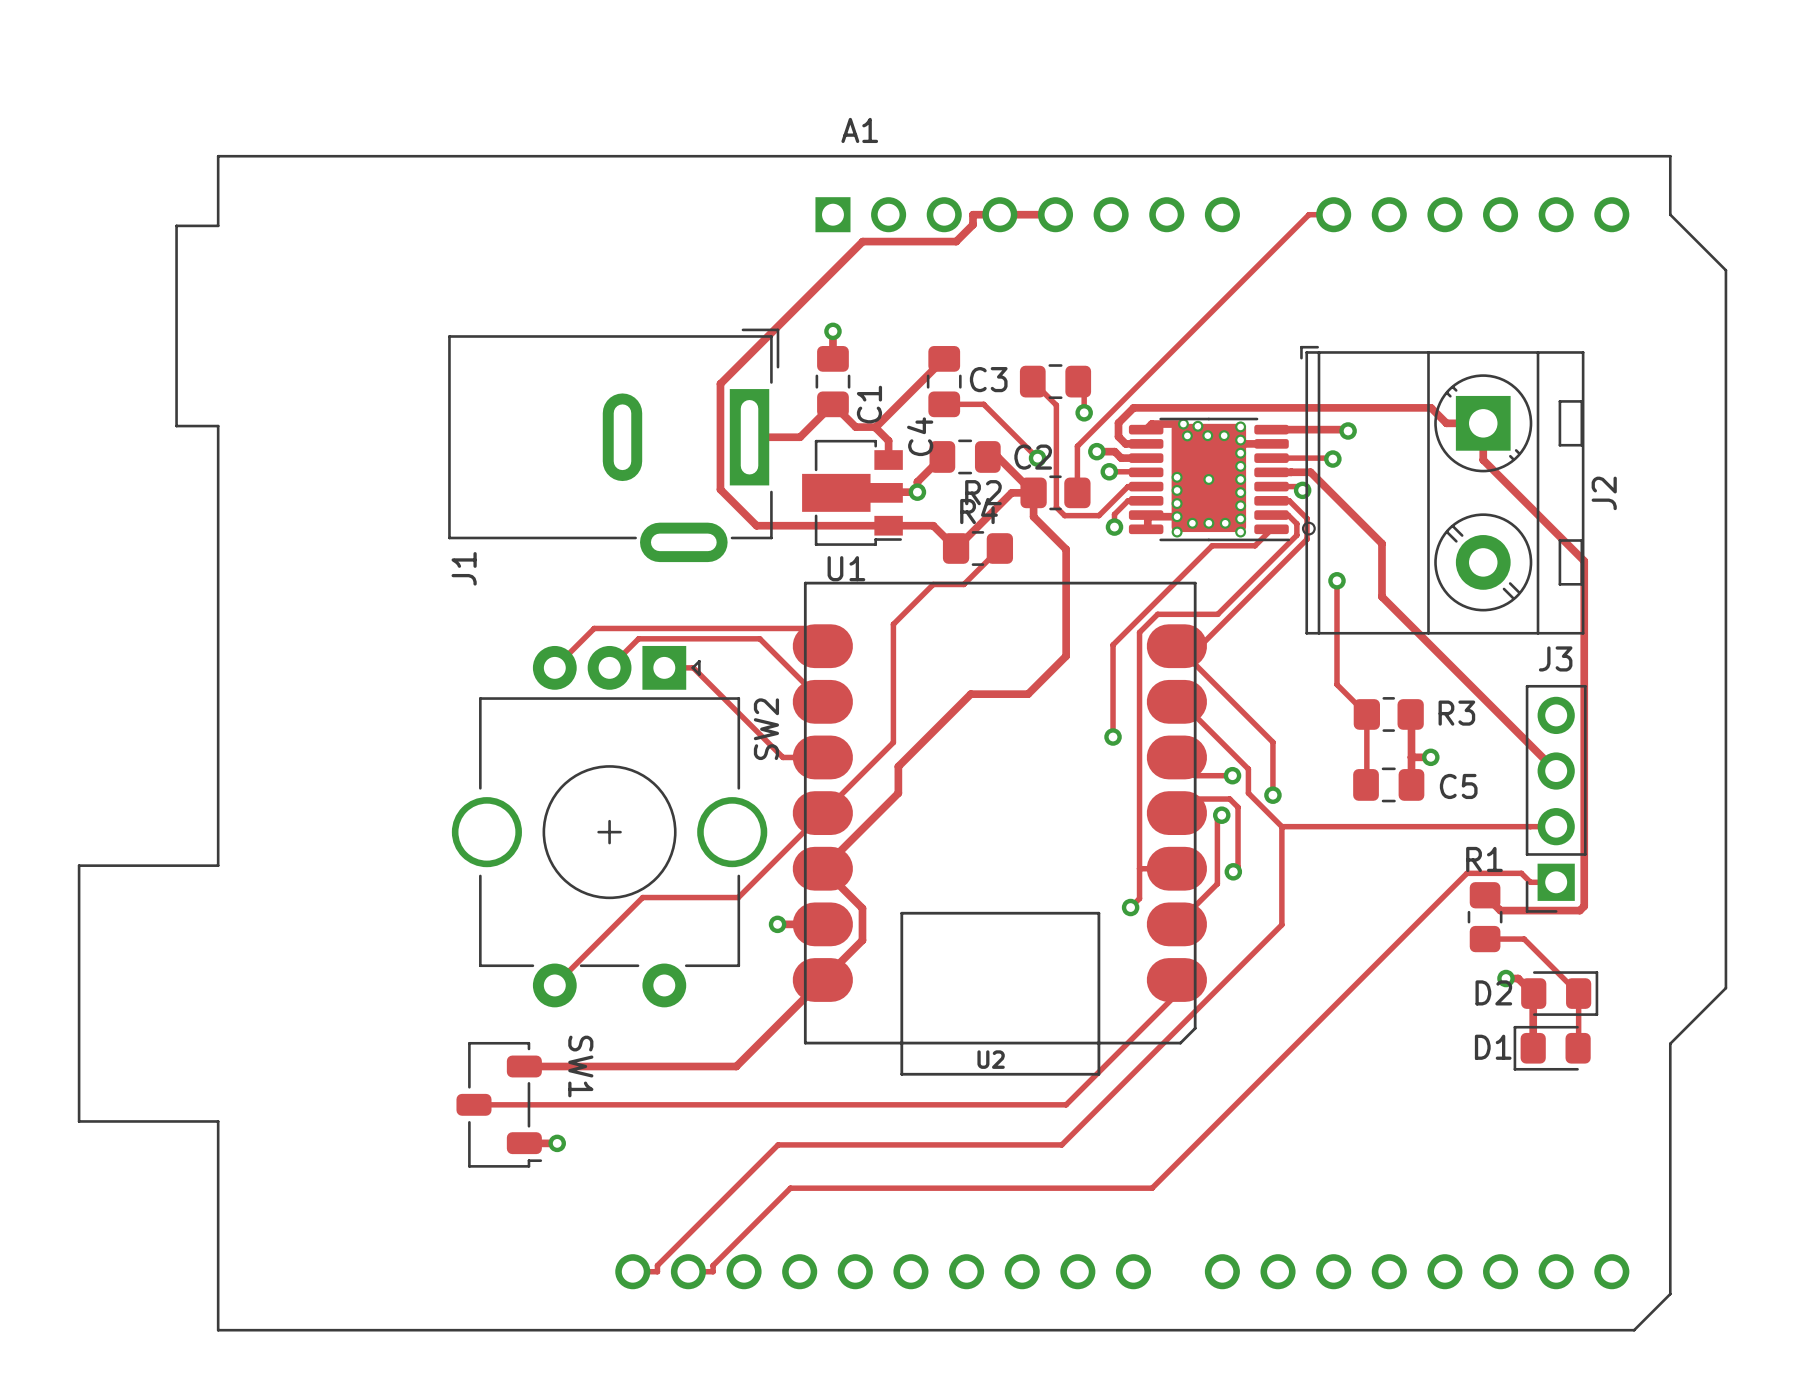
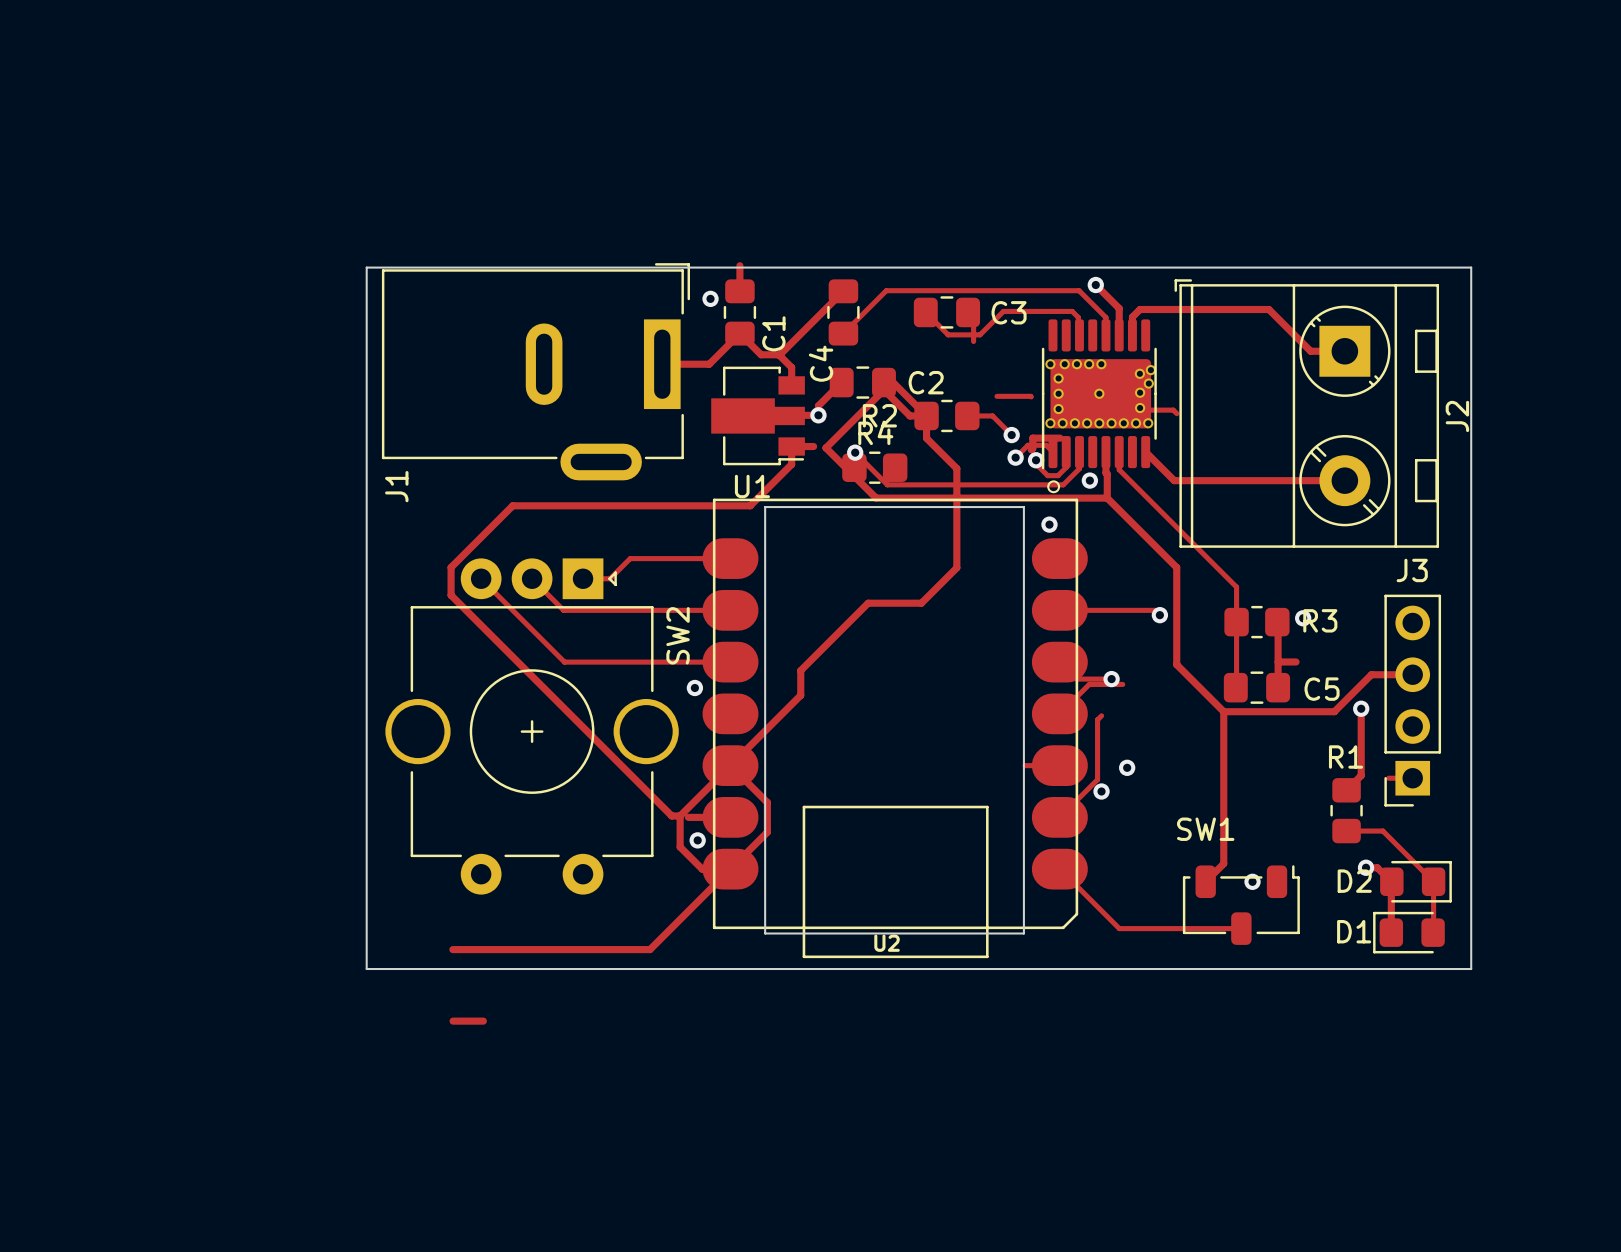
track: (1055, 214) (973, 214) (973, 224) (956, 241) (862, 241) (720, 383) (720, 489) (756, 525) (888, 525) -> (680, 815) (671, 815) (451, 595) (451, 567) (512, 505) (750, 505) (791, 464) (791, 446)
track: (1333, 214) (1308, 214) (1077, 446) (1077, 492) -> (1011, 435) (992, 415) (967, 415)
via position: (832, 331) -> (710, 298)
board edge: none -> (366, 267) (1471, 267) (1471, 969) (366, 969) (366, 267)
track: none -> (1095, 285) (1119, 308) (1119, 335)
via: none -> (1095, 285)
C3 name position: C3 (988, 379) -> C3 (1009, 312)
track: (944, 404) (983, 404) (1037, 458) -> (843, 333) (886, 290) (1079, 290) (1105, 317) (1105, 335)
track: (1056, 405) (1056, 507) (1064, 515) (1098, 515) (1128, 486) (1146, 486) -> (947, 334) (980, 334) (1003, 311) (1072, 311) (1078, 317) (1079, 335)
track: (1431, 407) (1133, 407) (1118, 422) (1118, 436) (1125, 443) (1146, 443) -> (1296, 336) (1268, 309) (1140, 309) (1132, 317) (1132, 335)
via: (1084, 412) -> none
track: (1483, 423) (1483, 460) (1584, 561) (1584, 906) (1579, 910) (1500, 910) (1485, 895) -> (1361, 708) (1361, 775) (1346, 790)
track: (1183, 424) (1151, 424) (1146, 429) -> none
track: (1271, 429) (1348, 430) -> none
via: (1348, 430) -> none
track: (1096, 451) (1114, 451) (1121, 458) (1146, 458) -> none
via: (1096, 451) -> none
via: (1037, 458) -> none
track: (1271, 458) (1332, 459) -> none
via: (1332, 459) -> none
via: (1109, 471) -> none
track: (1271, 472) (1310, 472) (1381, 543) (1381, 596) (1556, 771) -> (1223, 711) (1334, 711) (1371, 674) (1412, 674)
part rotation: 0° (1222, 479) -> 90° clockwise (1099, 406)
via: (1302, 490) -> none
track: (1015, 492) (1011, 492) (956, 548) (933, 525) (912, 525) -> (909, 415) (883, 389) (825, 447) (876, 498) (1107, 498)
track: (1146, 500) (1128, 500) (1114, 514) (1114, 527) -> none
track: (1271, 500) (1289, 500) (1307, 518) (1307, 539) (1188, 657) (1272, 742) (1272, 795) -> none
via: none -> (1011, 435)
track: (1271, 515) (1288, 515) (1296, 523) (1296, 535) (1217, 614) (1157, 614) (1139, 632) (1139, 898) (1130, 907) -> none
via: (1114, 527) -> none
track: (1271, 529) (1255, 545) (1212, 545) (1113, 644) (1113, 737) -> none
track: none -> (1052, 452) (1046, 445) (1027, 445) (1015, 457)
track: none -> (1066, 452) (1066, 467) (1058, 475) (1047, 475) (1036, 463) (1036, 460)
track: none -> (1079, 452) (1079, 468) (1063, 484) (887, 484) (855, 452)
track: none -> (1105, 452) (1107, 498)
track: none -> (1145, 452) (1174, 480) (1344, 480)
via: none -> (855, 452)
via: none -> (1015, 457)
via: none -> (1036, 460)
track: (999, 548) (963, 584) (933, 584) (893, 624) (893, 742) (738, 897) (642, 897) (554, 985) -> none
via: none -> (1089, 480)
track: (1336, 580) (1336, 684) (1366, 714) -> (1119, 452) (1119, 469) (1236, 587) (1236, 622)
via: (1336, 580) -> none
track: none -> (1107, 498) (1176, 567) (1176, 664) (1223, 711)
board edge: none -> (765, 507) (1023, 507) (1023, 933) (765, 933) (765, 507)
via: none -> (1049, 524)
track: (822, 646) (805, 628) (594, 628) (554, 667) -> (693, 662) (564, 662) (481, 578)
track: (609, 667) (638, 638) (759, 638) (822, 701) -> (532, 578) (563, 610) (730, 610)
track: (693, 667) (782, 757) -> (610, 578) (630, 558) (730, 558)
track: (1181, 701) (1248, 769) (1248, 793) (1281, 826) -> (1063, 610) (1155, 610) (1159, 615)
via: none -> (1159, 615)
via: none -> (1303, 618)
via: (1113, 737) -> none
A1: (902, 743) -> none
via: (1430, 757) -> none
via: none -> (694, 687)
via: (1272, 795) -> none
track: (1190, 799) (1229, 799) (1238, 807) (1238, 867) (1233, 871) -> (1072, 700) (1089, 684) (1122, 684)
via: none -> (1361, 708)
track: none -> (1223, 711) (1223, 863) (1205, 881)
via: (1221, 815) -> none
track: (1281, 826) (1556, 826) -> none
track: (1281, 826) (1281, 924) (1061, 1144) (778, 1144) (657, 1265) (657, 1271) (632, 1271) -> none
track: none -> (730, 765) (680, 815)
via position: (1233, 871) -> (1127, 767)
track: (1530, 882) (1521, 873) (1466, 873) (1152, 1188) (790, 1188) (713, 1265) (713, 1271) (688, 1271) -> none
via: none -> (1101, 791)
via: (1130, 907) -> none
track: none -> (680, 815) (680, 847) (702, 869) (730, 869)
via position: (777, 924) -> (697, 840)
track: (1176, 979) (1176, 994) (1066, 1104) (473, 1104) -> (1059, 869) (1119, 928) (1241, 928)
via: none -> (1252, 881)
SW1 rotation: 0° (499, 1104) -> 90° counterclockwise (1241, 905)
SW1 position: (499, 1104) -> (1241, 905)
via: (557, 1143) -> none

